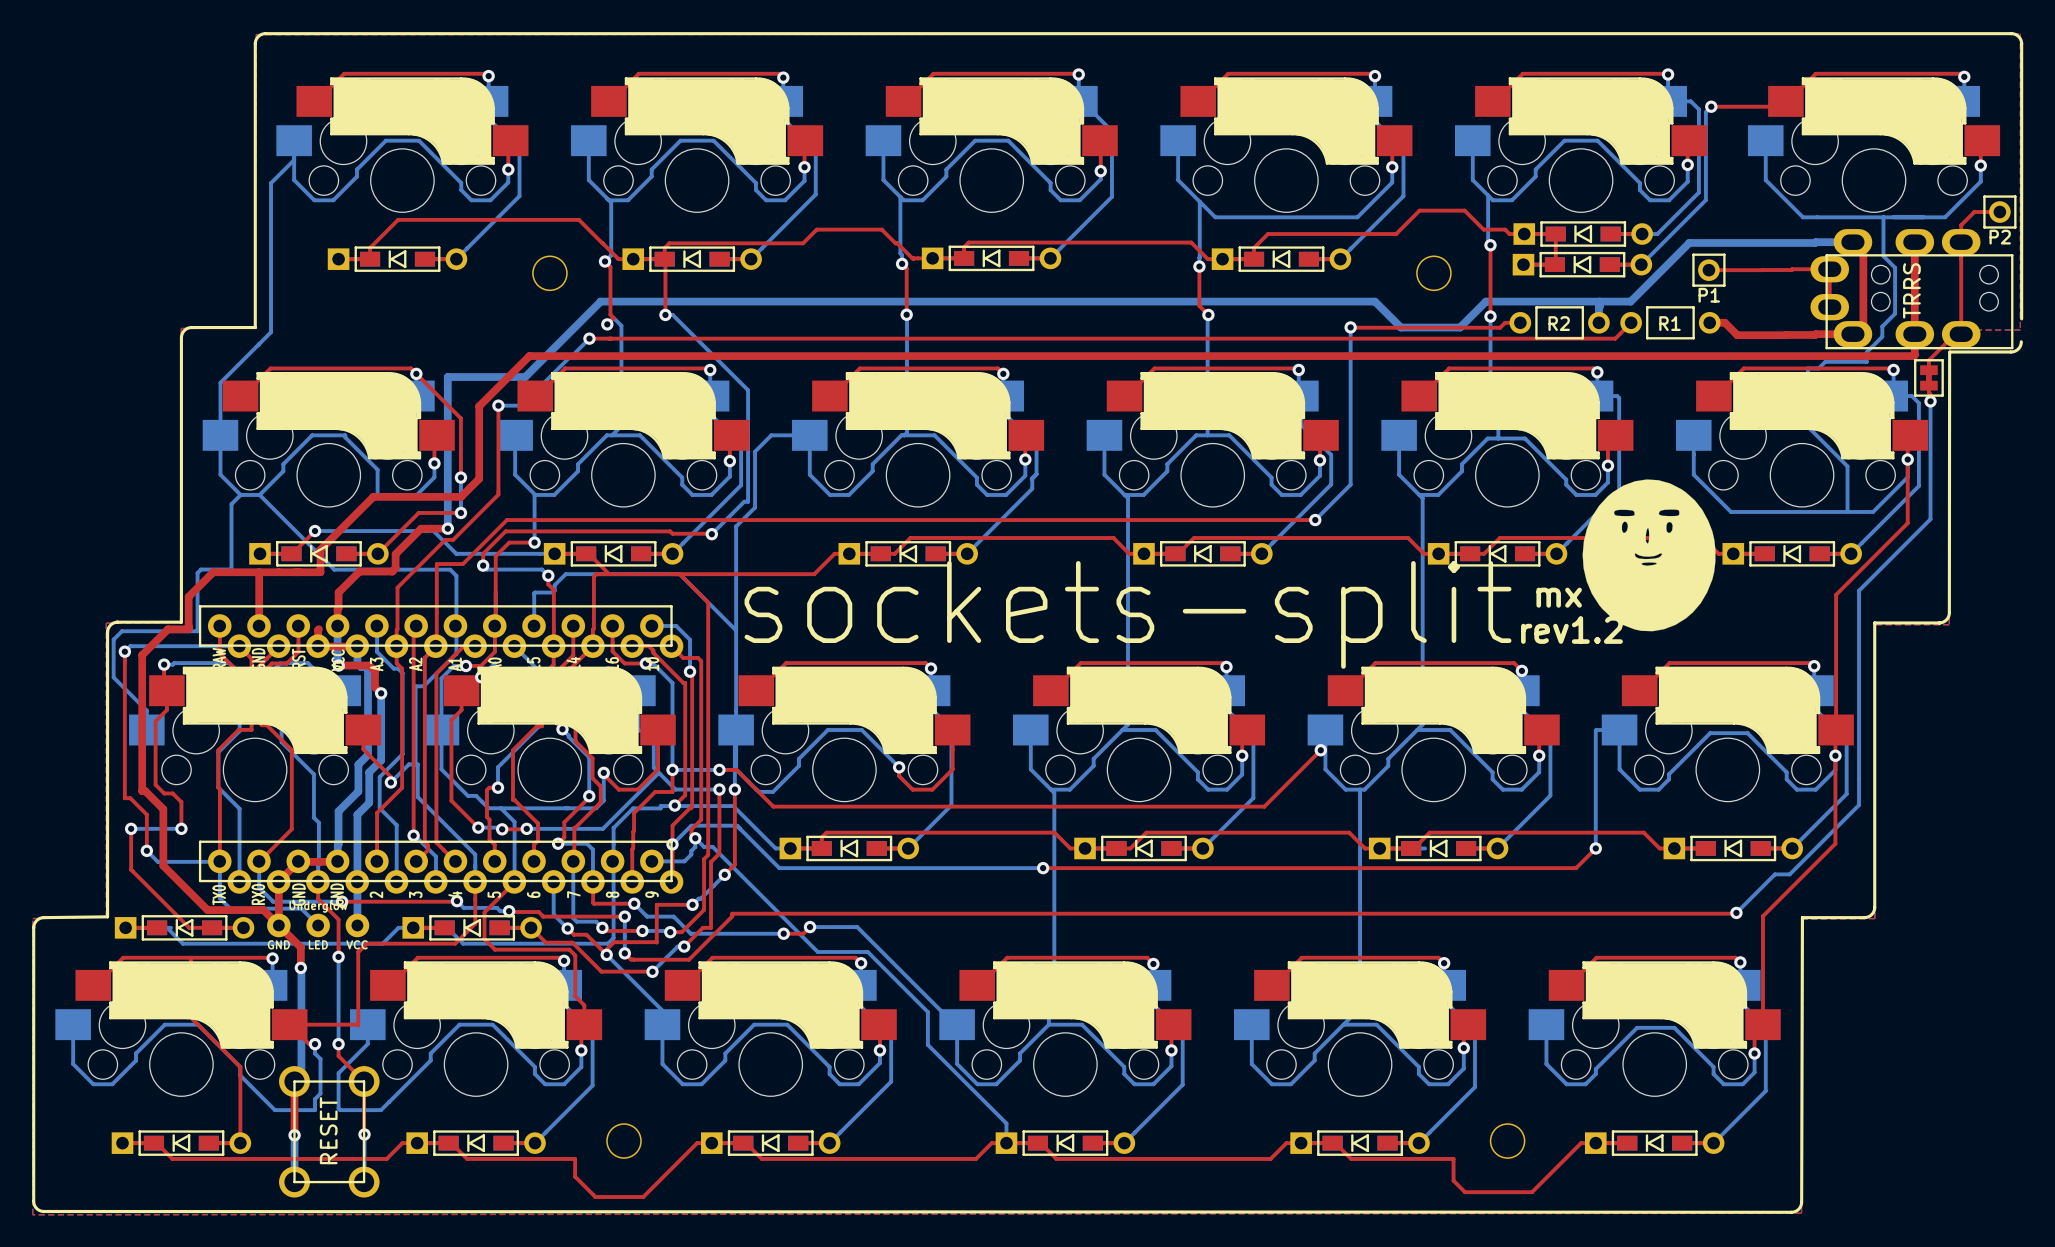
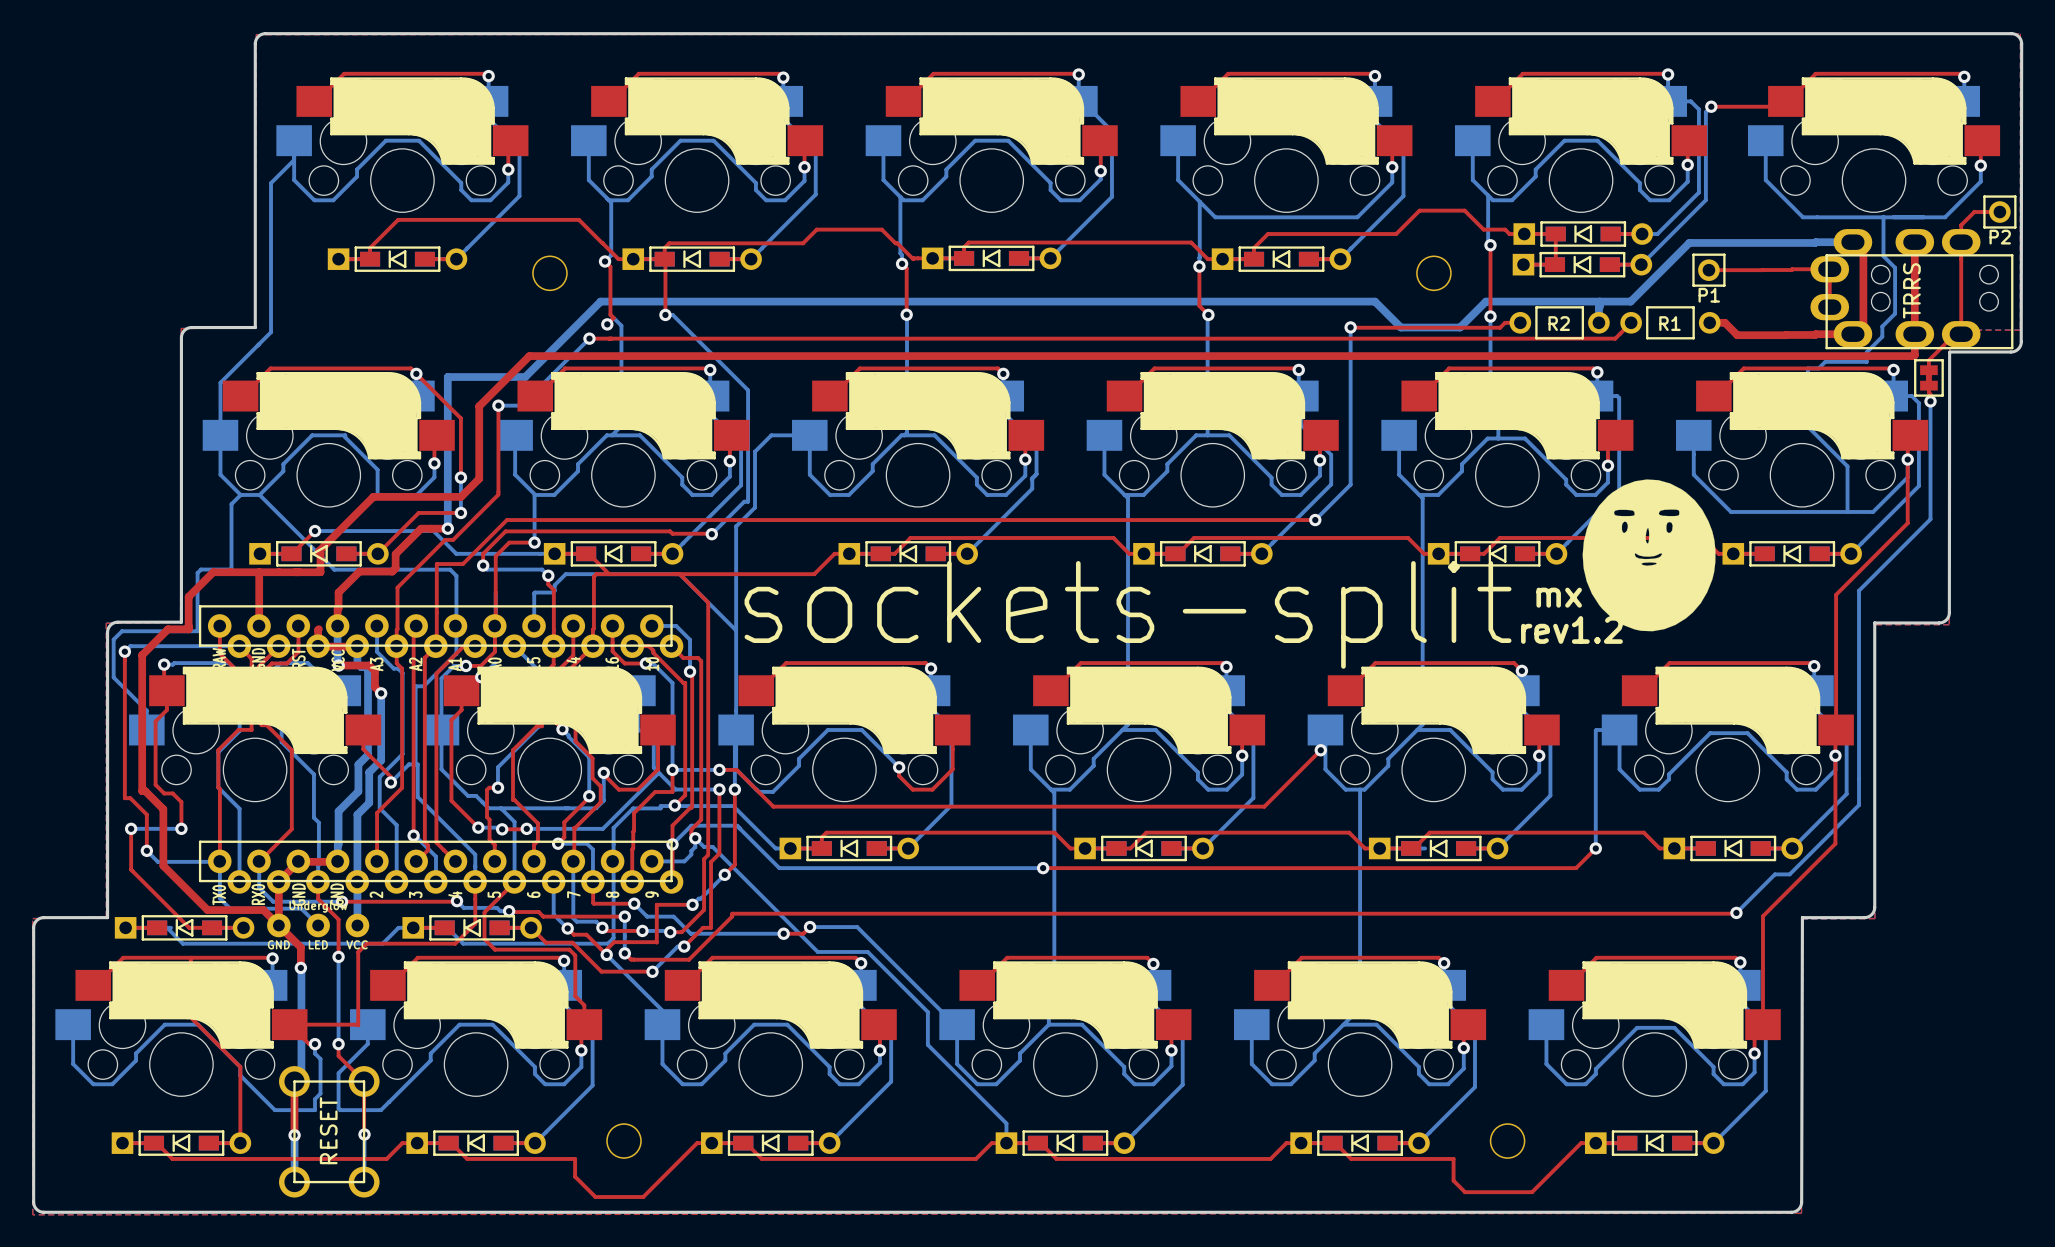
line: (2021, 318) (2021, 43) (2019, 37) (2012, 33) (264, 33) (257, 37) (255, 43) (255, 327) (190, 327) (182, 333) (181, 622) (117, 622) -> none
line: (2021, 341) (2018, 349) (2011, 352) -> none
board edge: none -> (2021, 341) (2021, 43) (2019, 37) (2012, 33) (264, 33) (257, 37) (255, 43) (255, 327) (190, 327) (182, 333) (181, 622) (118, 622)
board edge: none -> (2021, 341) (2018, 349) (2011, 352)
line: (1949, 352) (1949, 612) (1946, 619) (1939, 622) -> none
board edge: none -> (1949, 352) (1949, 612) (1946, 619) (1939, 622)
line: (1950, 352) (2010, 352) -> none
board edge: none -> (1950, 352) (2010, 352)
line: (117, 622) (110, 625) (107, 632) -> none
board edge: none -> (117, 622) (110, 625) (107, 632)
board edge: none -> (1938, 622) (1874, 622) (1874, 908) (1871, 914) (1865, 917) (1802, 917) (1801, 1202) (1799, 1208) (1794, 1211) (43, 1212)
line: (1939, 622) (1874, 622) (1874, 908) (1871, 914) (1865, 917) (1802, 917) (1801, 1202) (1799, 1208) (1794, 1211) (43, 1211) (36, 1208) (33, 1201) -> none
line: (107, 631) (107, 916) (42, 917) (35, 921) (33, 927) -> none
board edge: none -> (107, 632) (107, 917) (42, 917) (35, 921) (33, 927)
line: (33, 927) (33, 1200) -> none
board edge: none -> (33, 928) (33, 1202) (36, 1209) (43, 1212)

